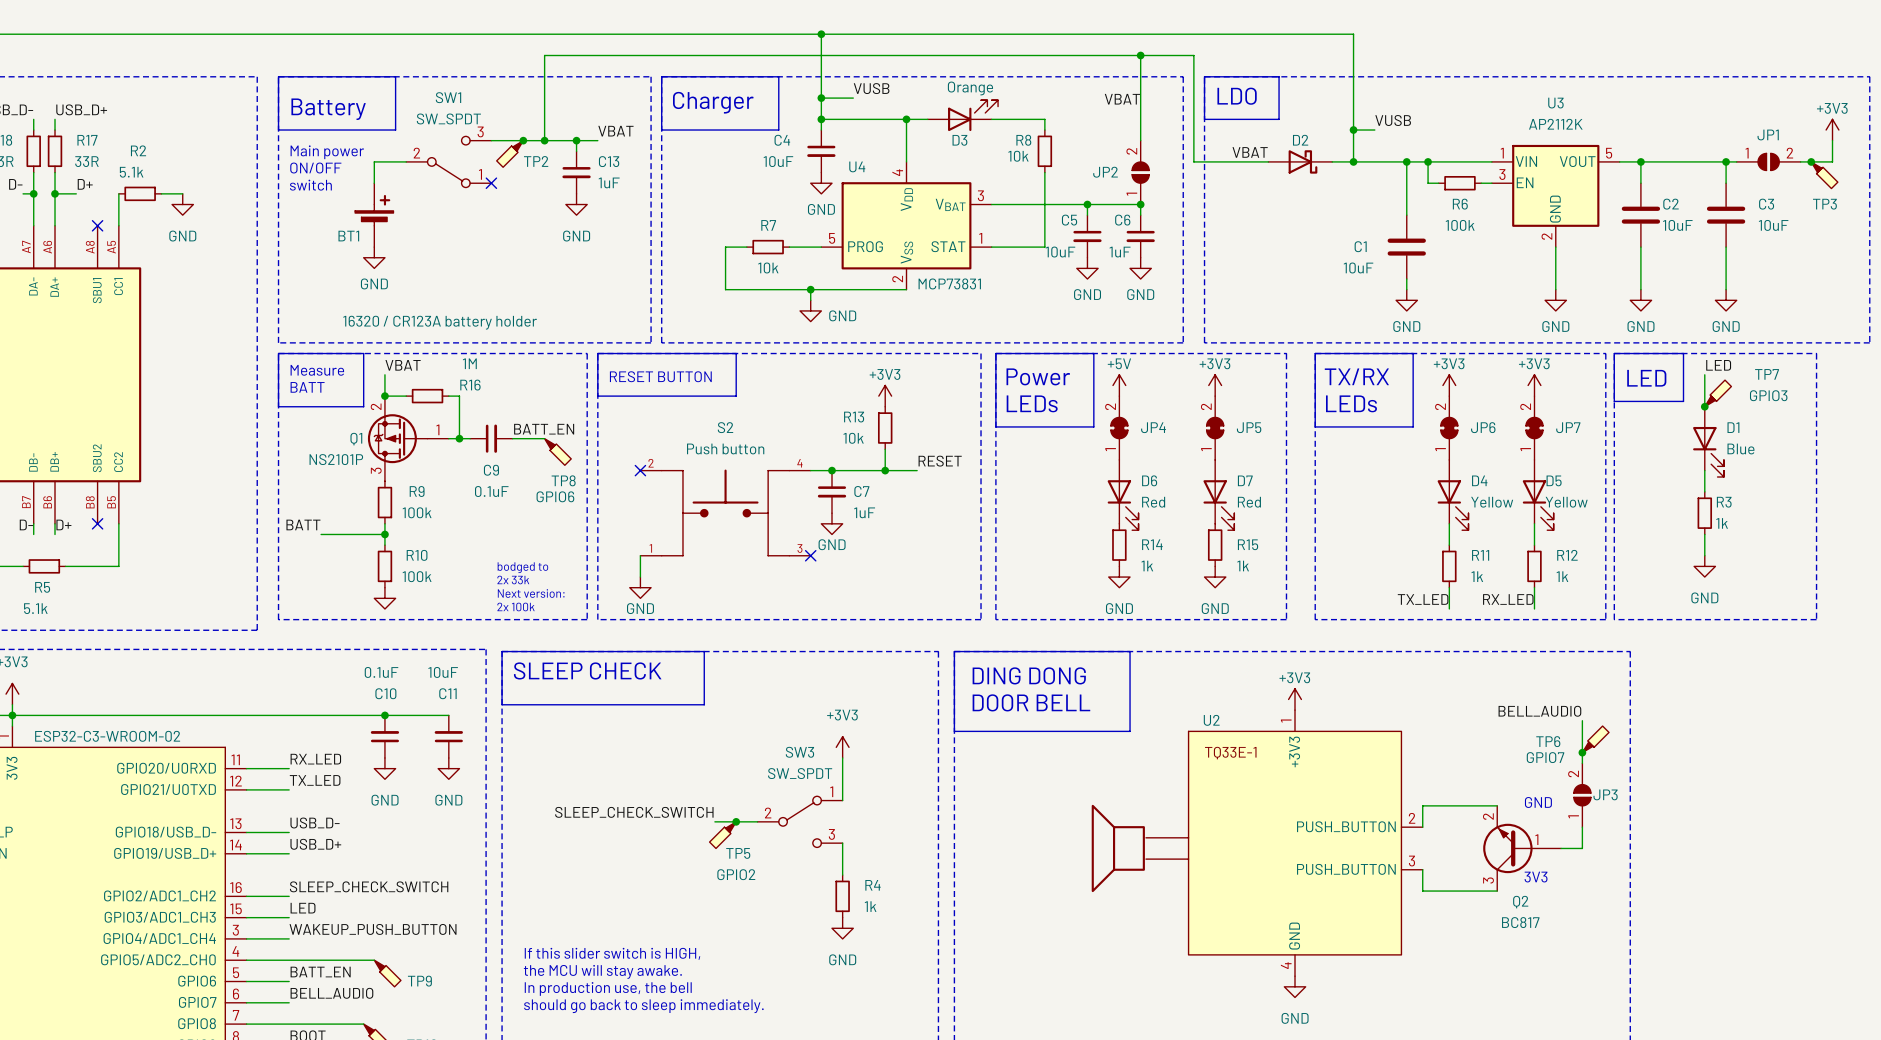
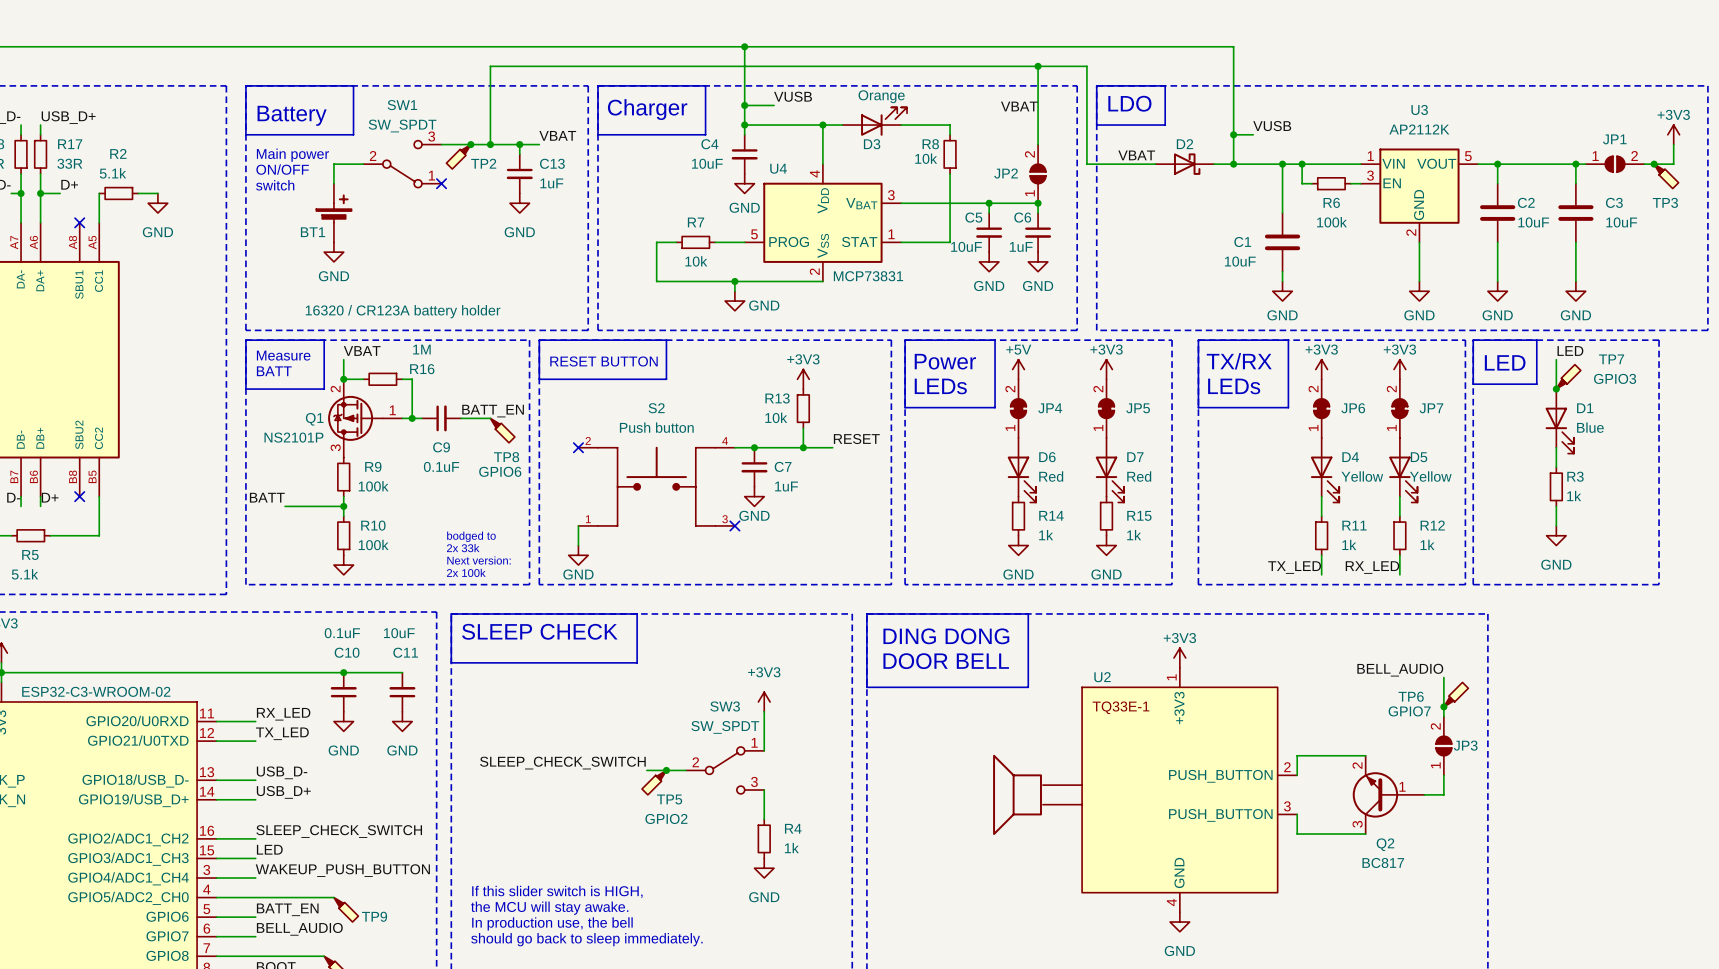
text: GND (1538, 802) -> none
text: 3V3 (1536, 877) -> none

